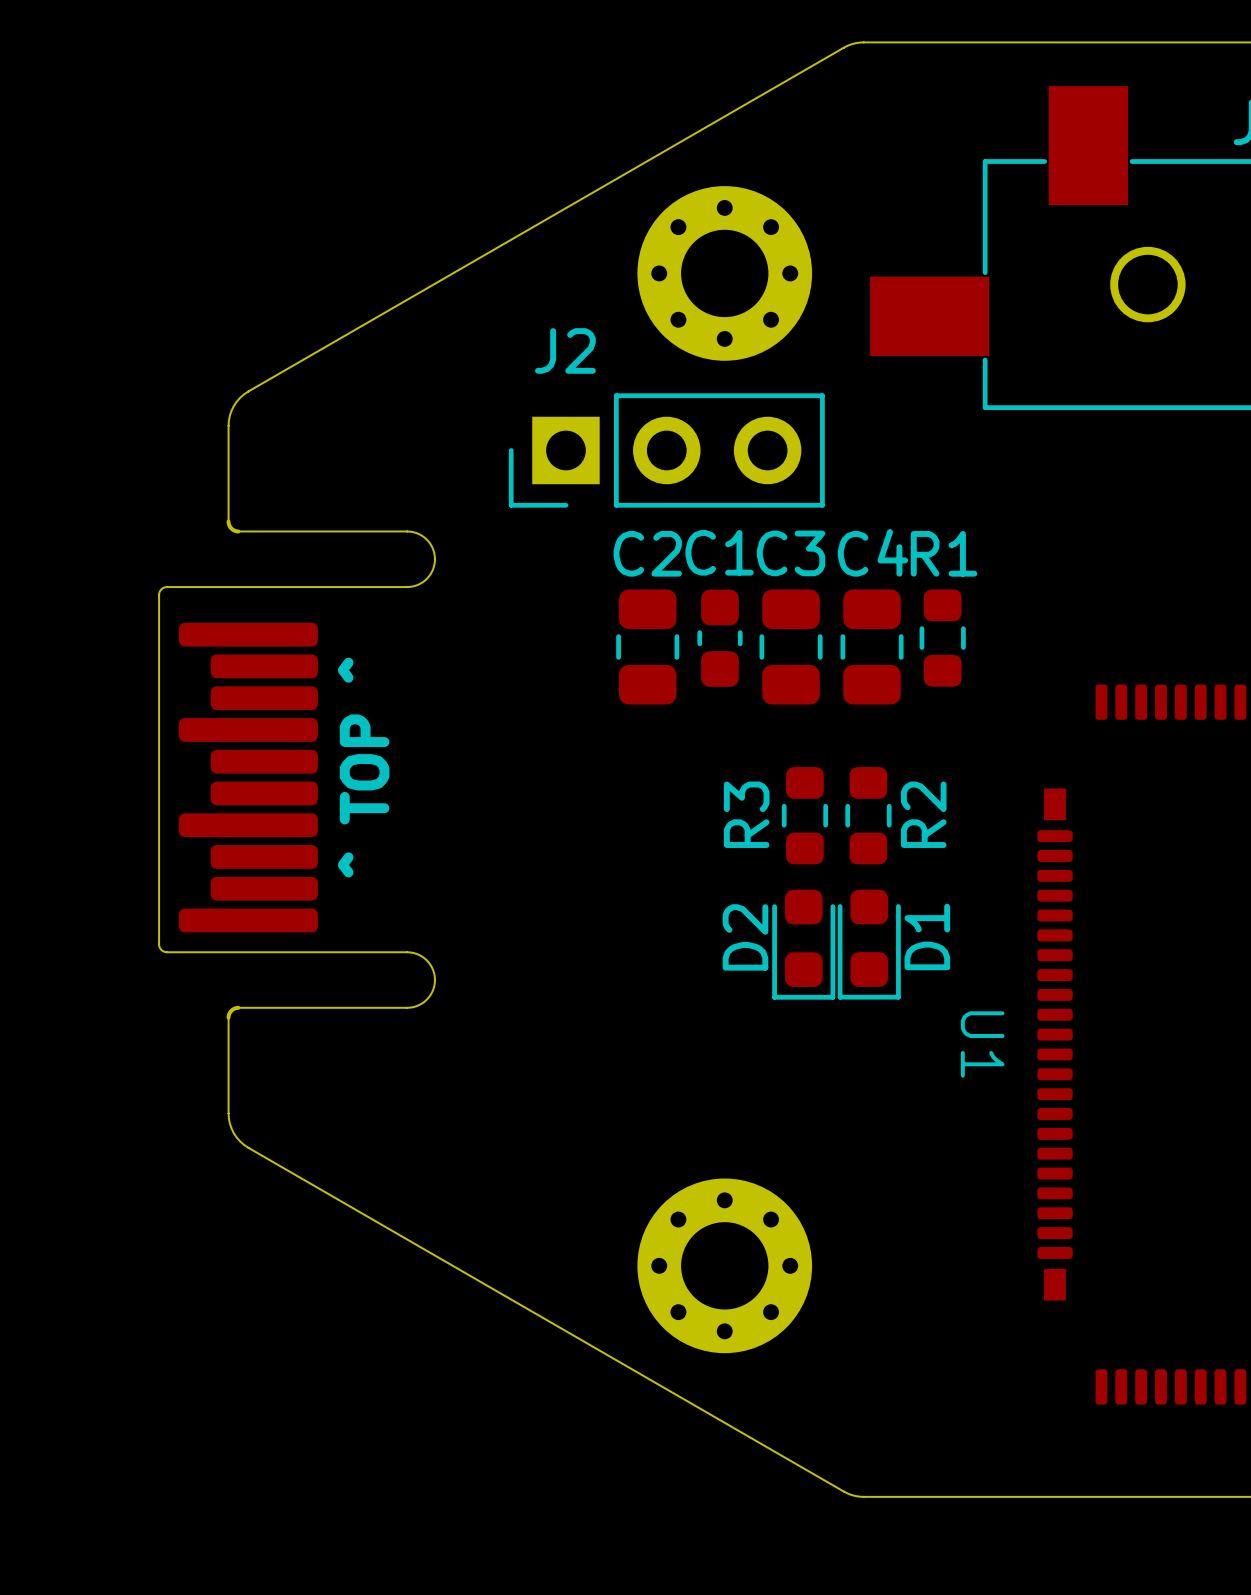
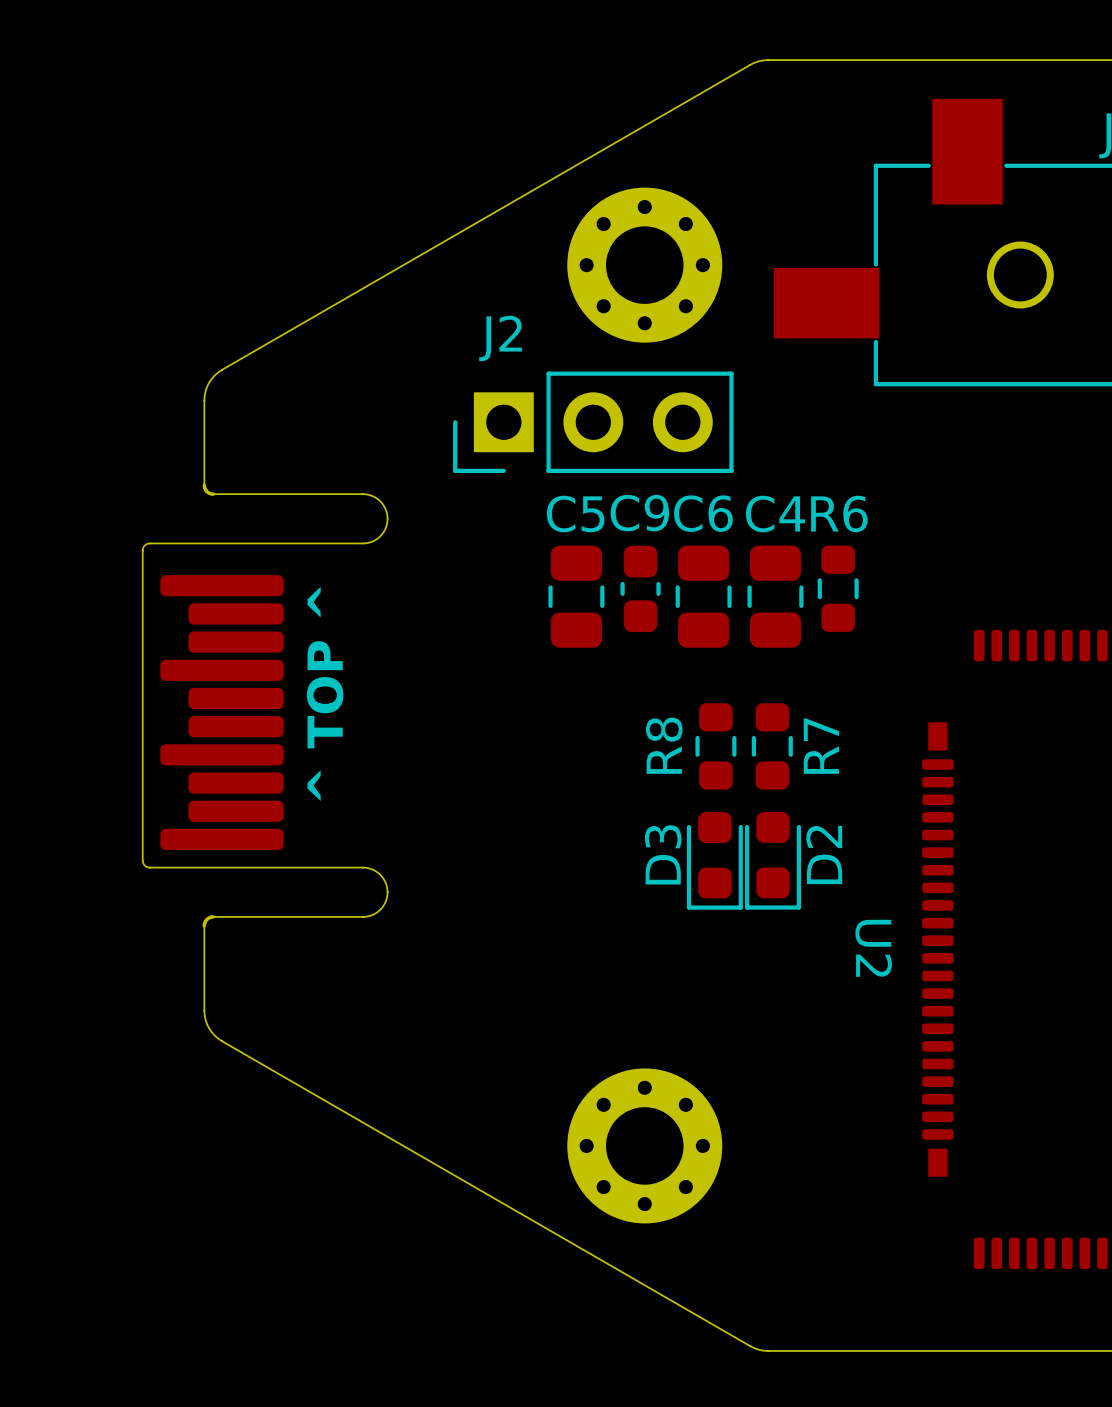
C1 name: C1 (719, 552) -> C9 (639, 513)
C2 name: C2 (647, 553) -> C5 (575, 513)
C3 name: C3 (791, 553) -> C6 (703, 513)
R1 name: R1 (944, 553) -> R6 (839, 513)
R3 name: R3 (746, 814) -> R8 (664, 745)
R2 name: R2 (923, 814) -> R7 (821, 746)
D2 name: D2 (745, 937) -> D3 (663, 854)
D1 name: D1 (927, 937) -> D2 (824, 854)
U1 name: U1 (982, 1044) -> U2 (873, 948)

